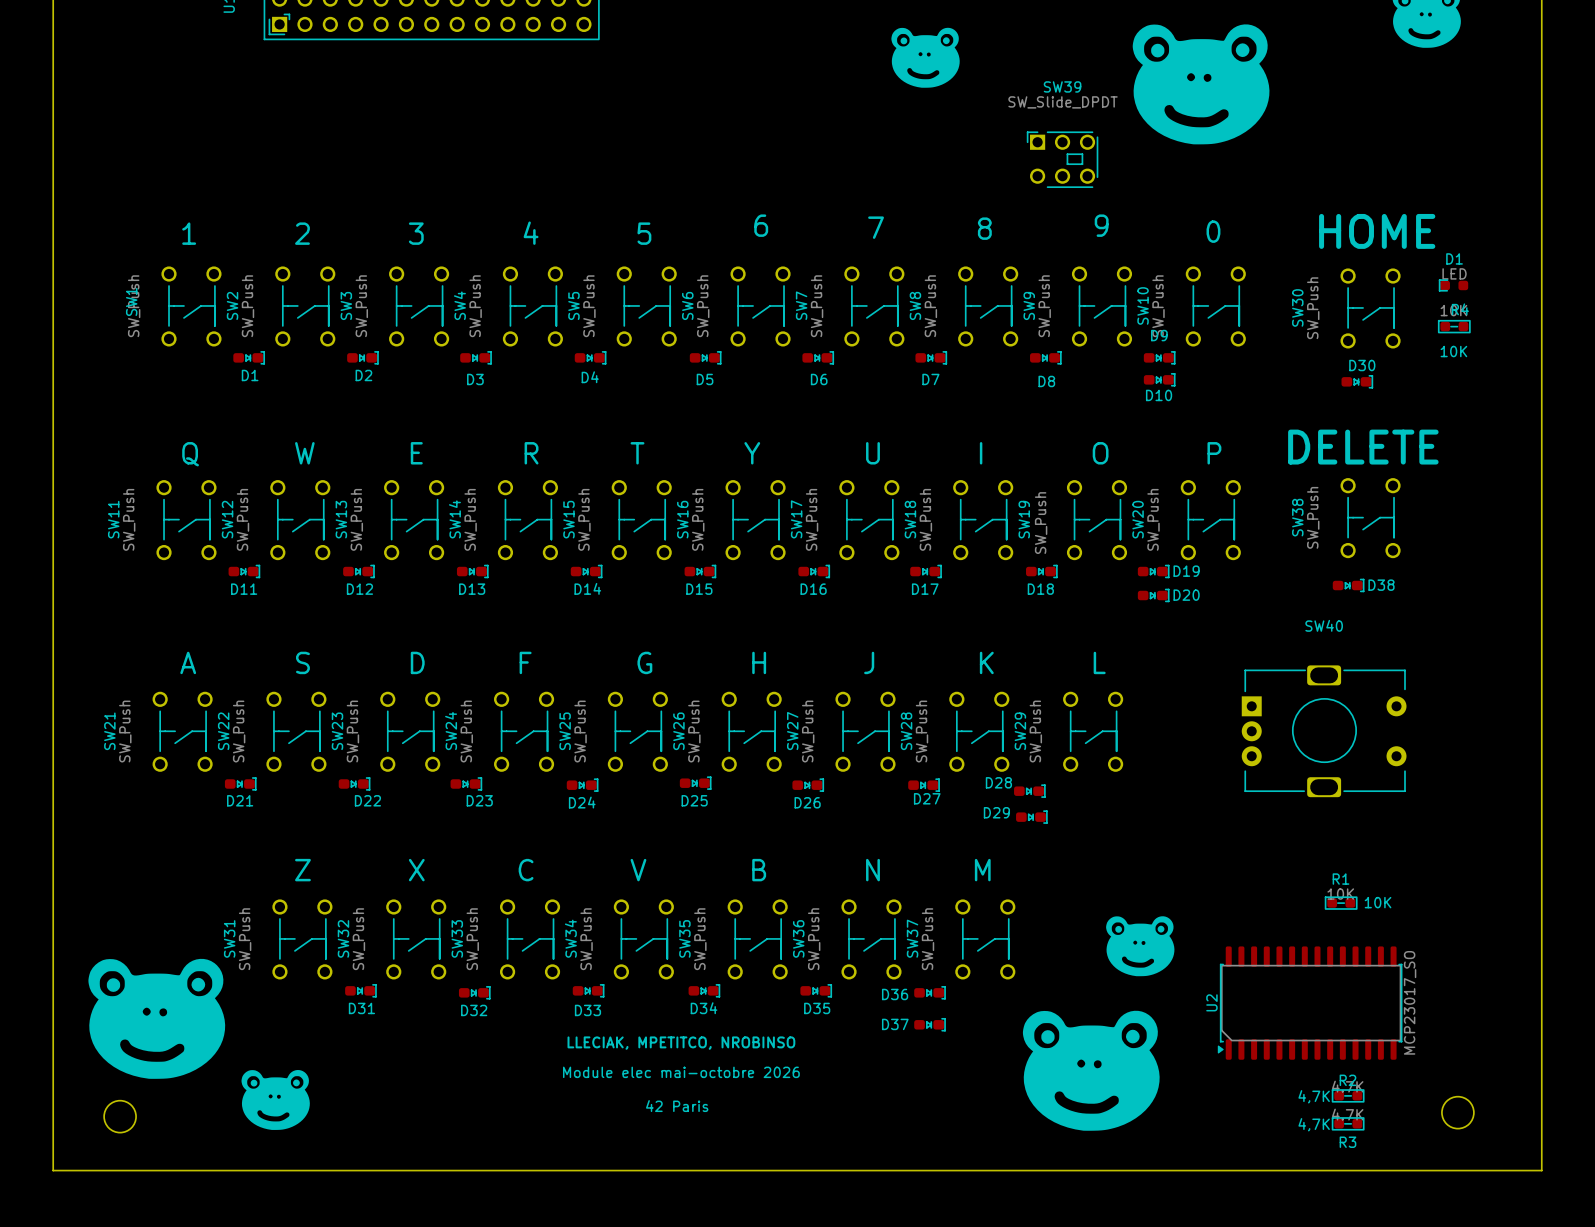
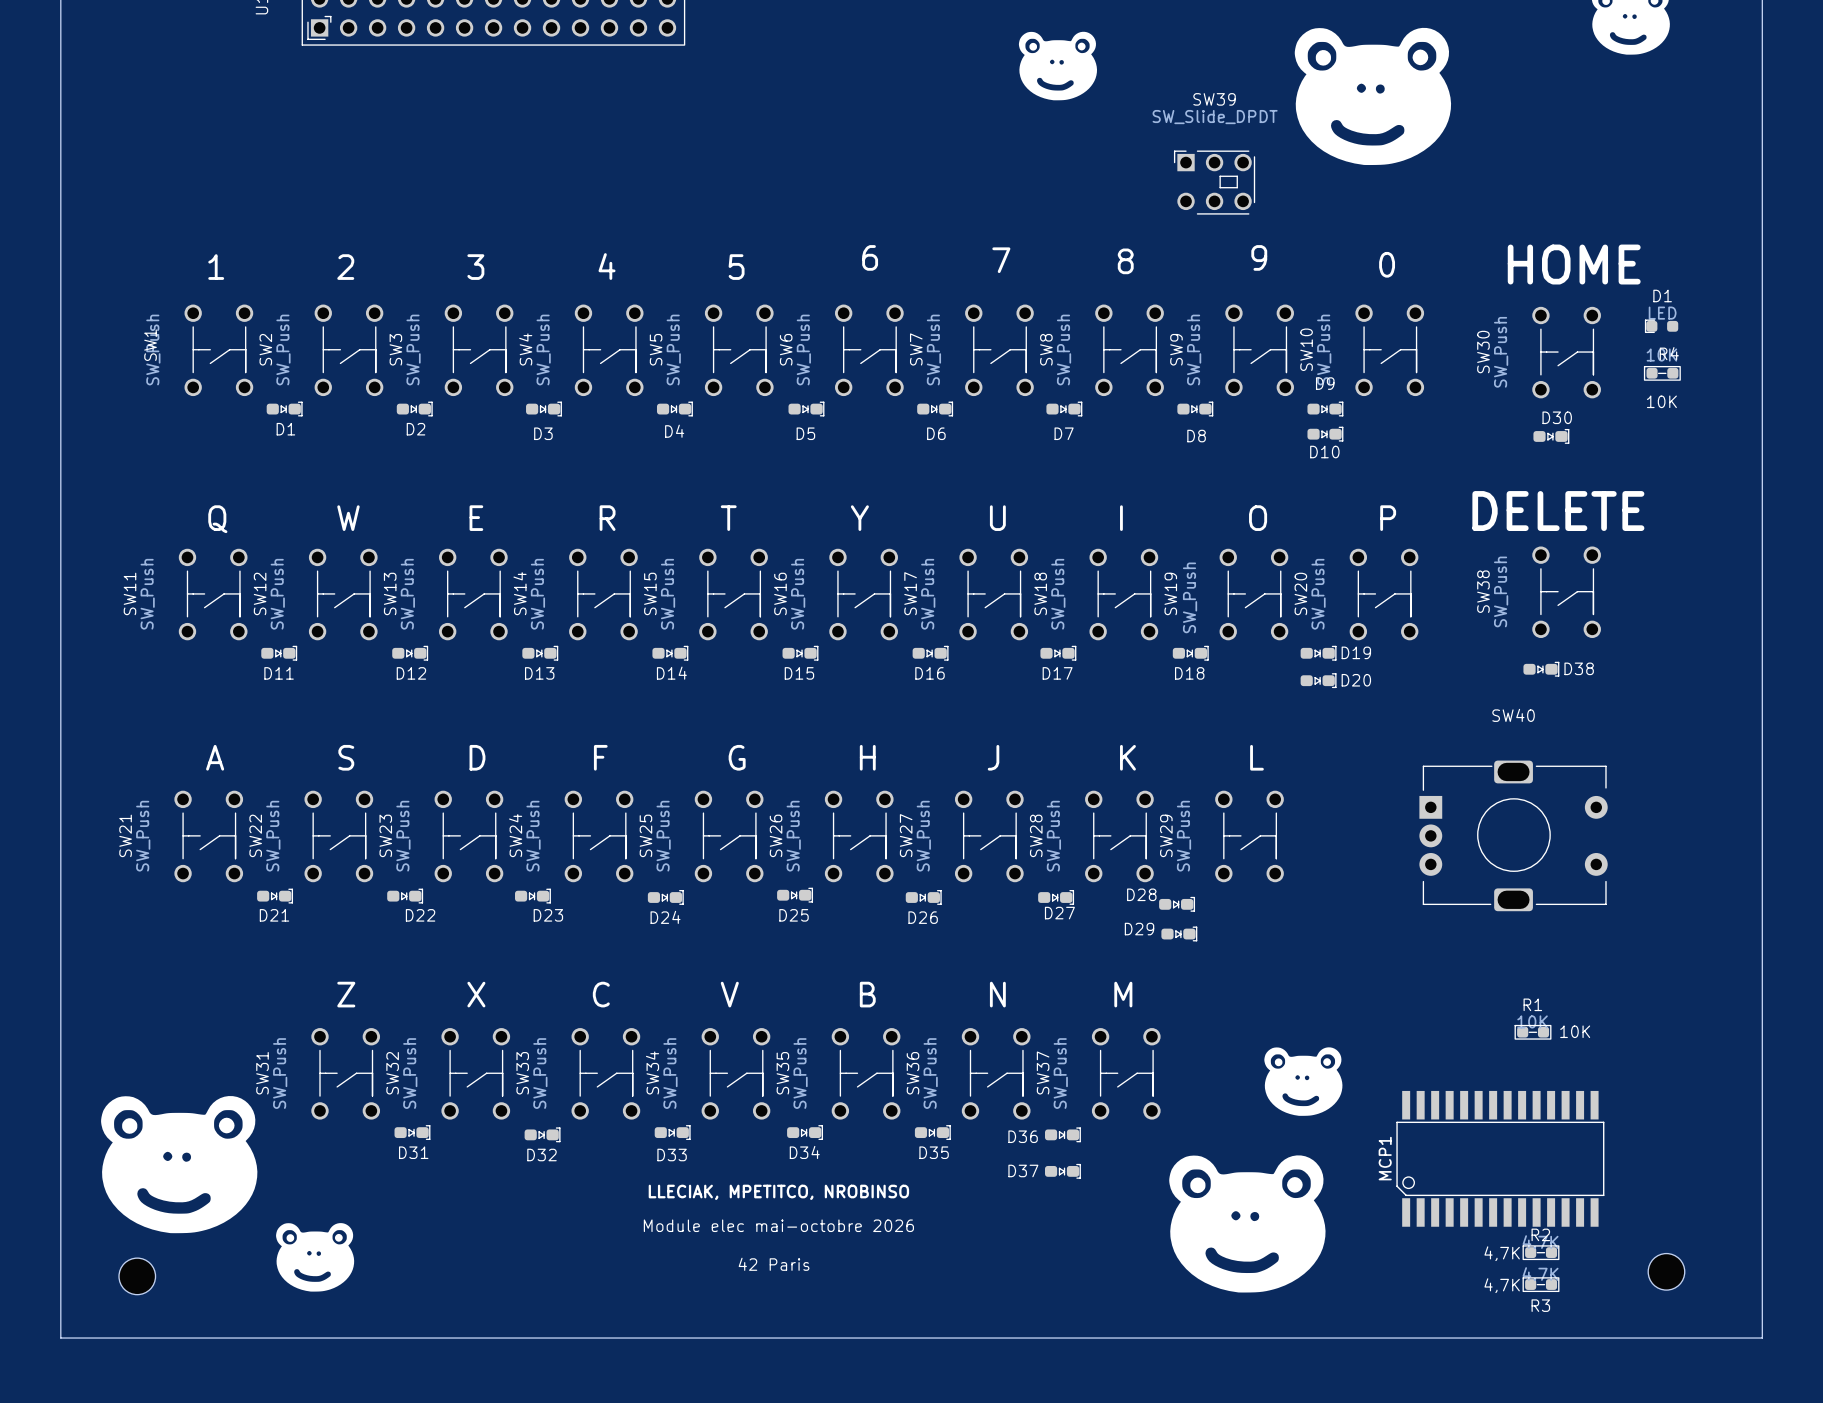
U2: MCP23017_SO (1310, 1003) -> none
MCP1: none -> (1500, 1158)

